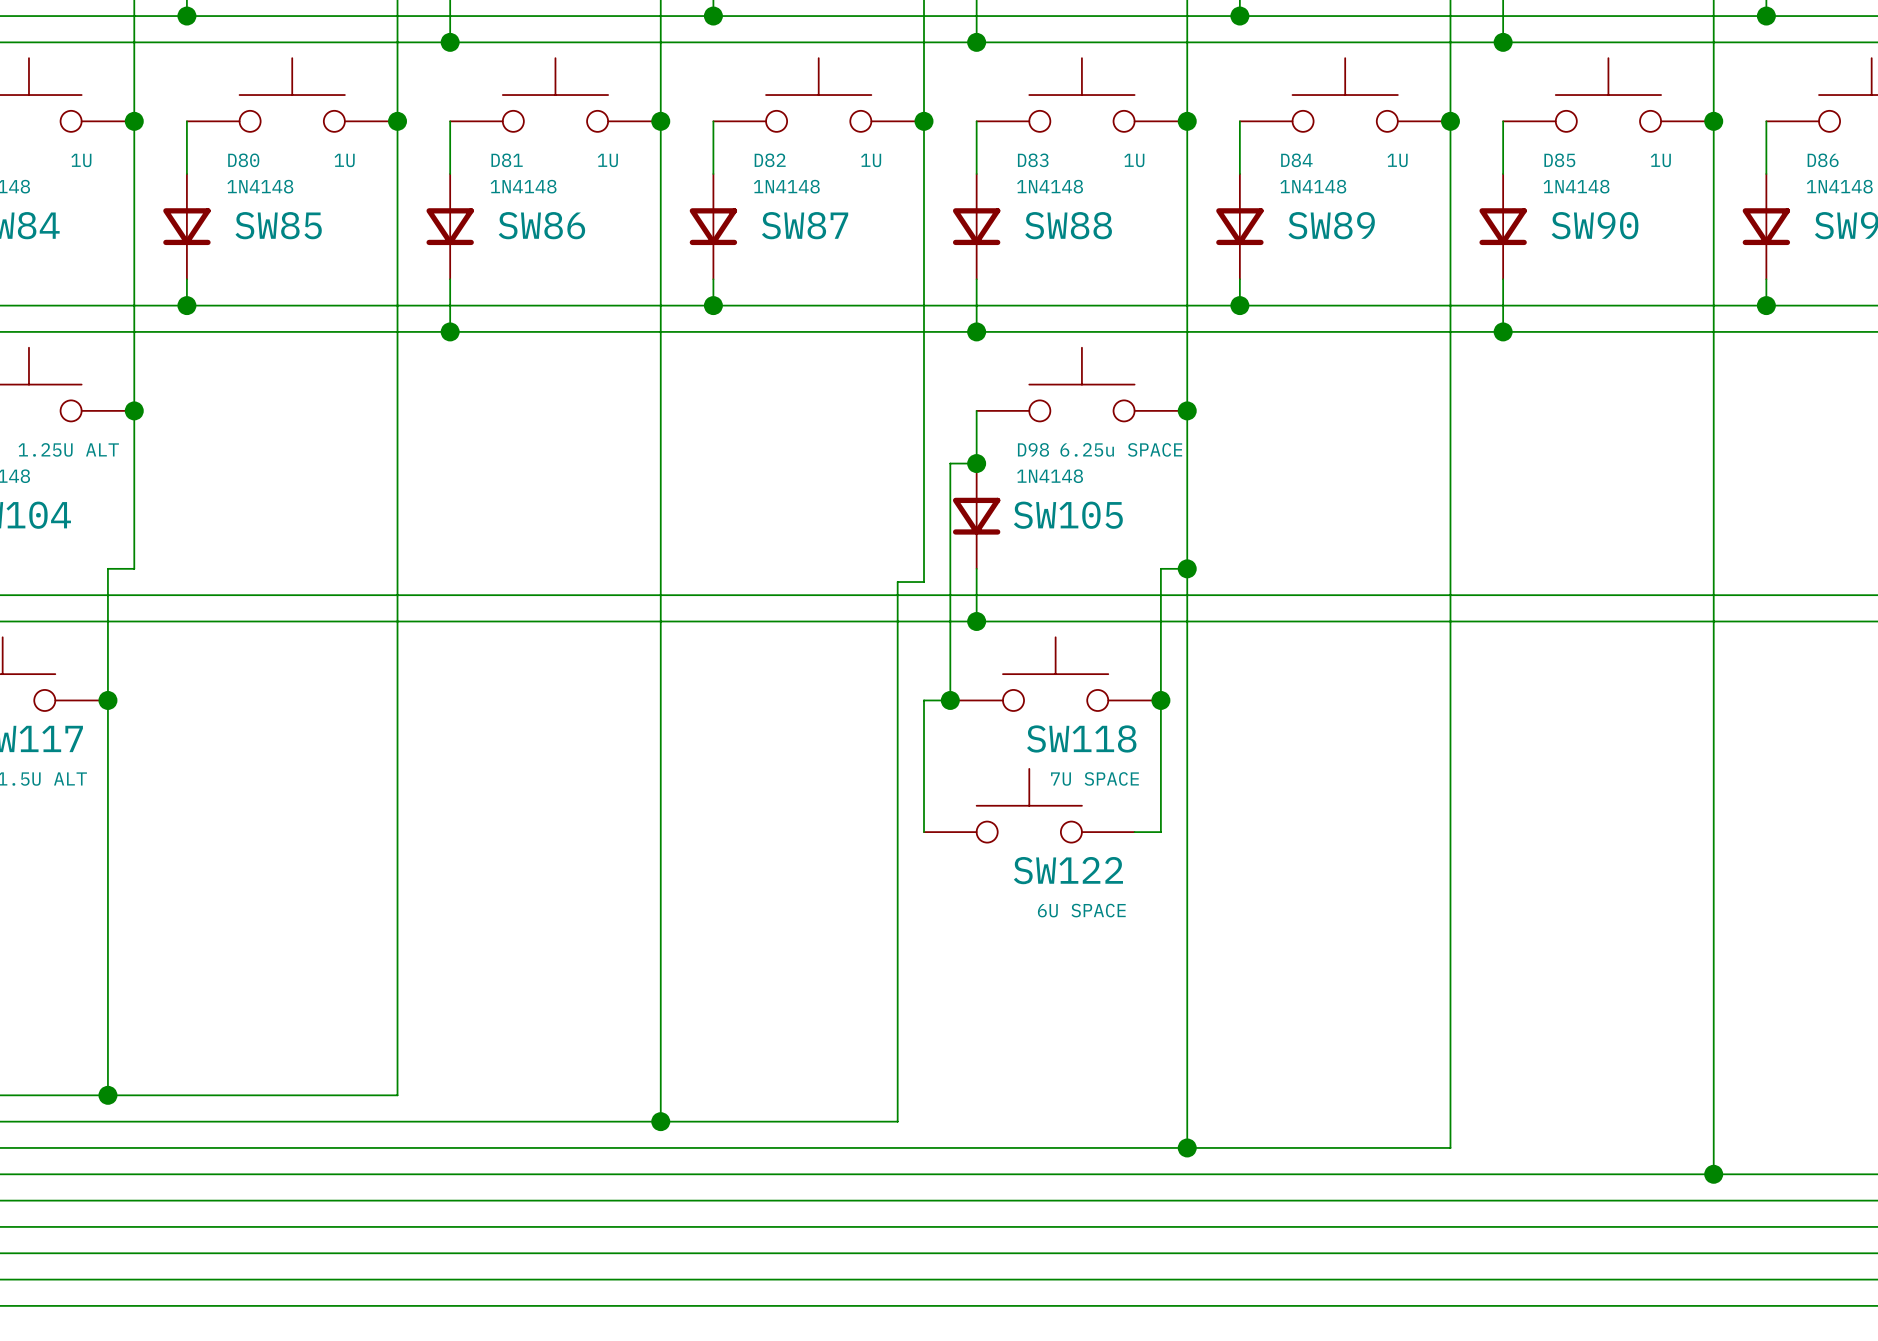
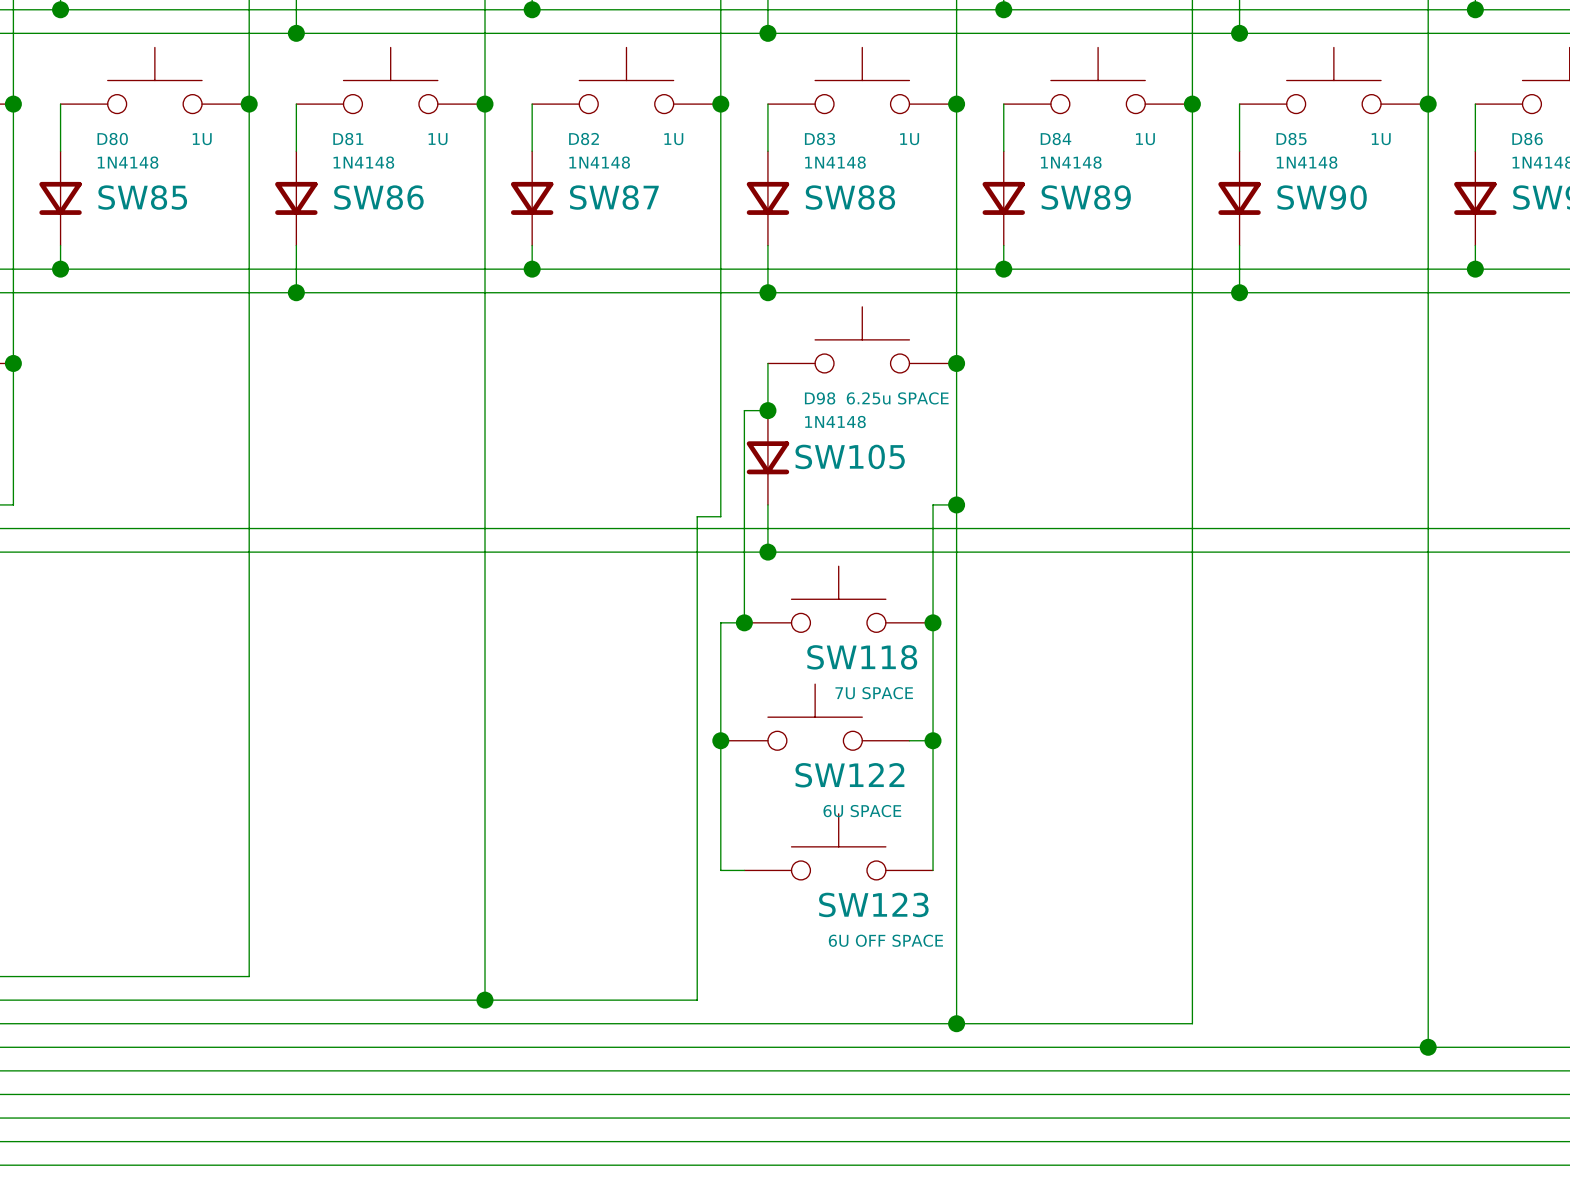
wire: none -> (720, 740) (720, 870) (744, 870)
junction: none -> (720, 740)
wire: none -> (933, 740) (933, 870)
junction: none -> (933, 740)
SW123: none -> 6U OFF SPACE (838, 846)

